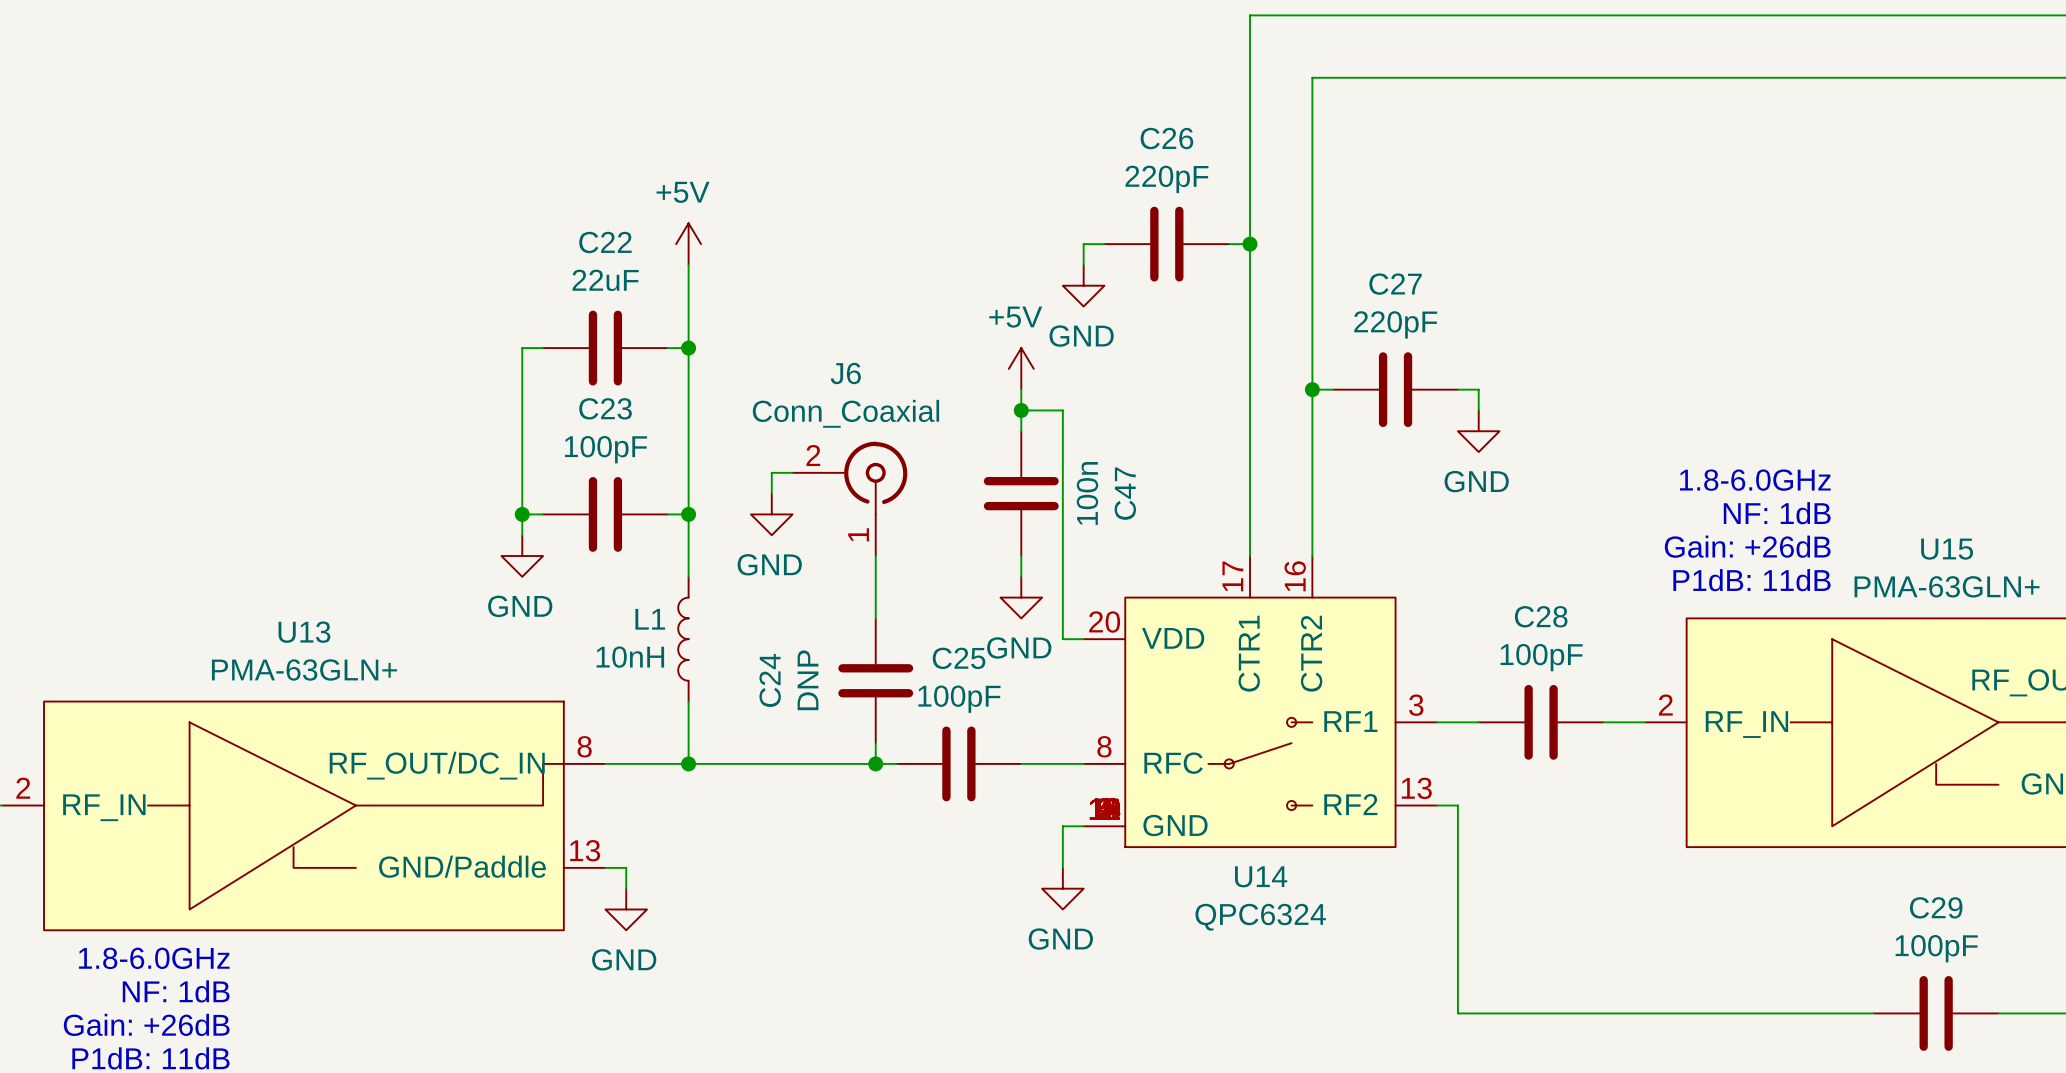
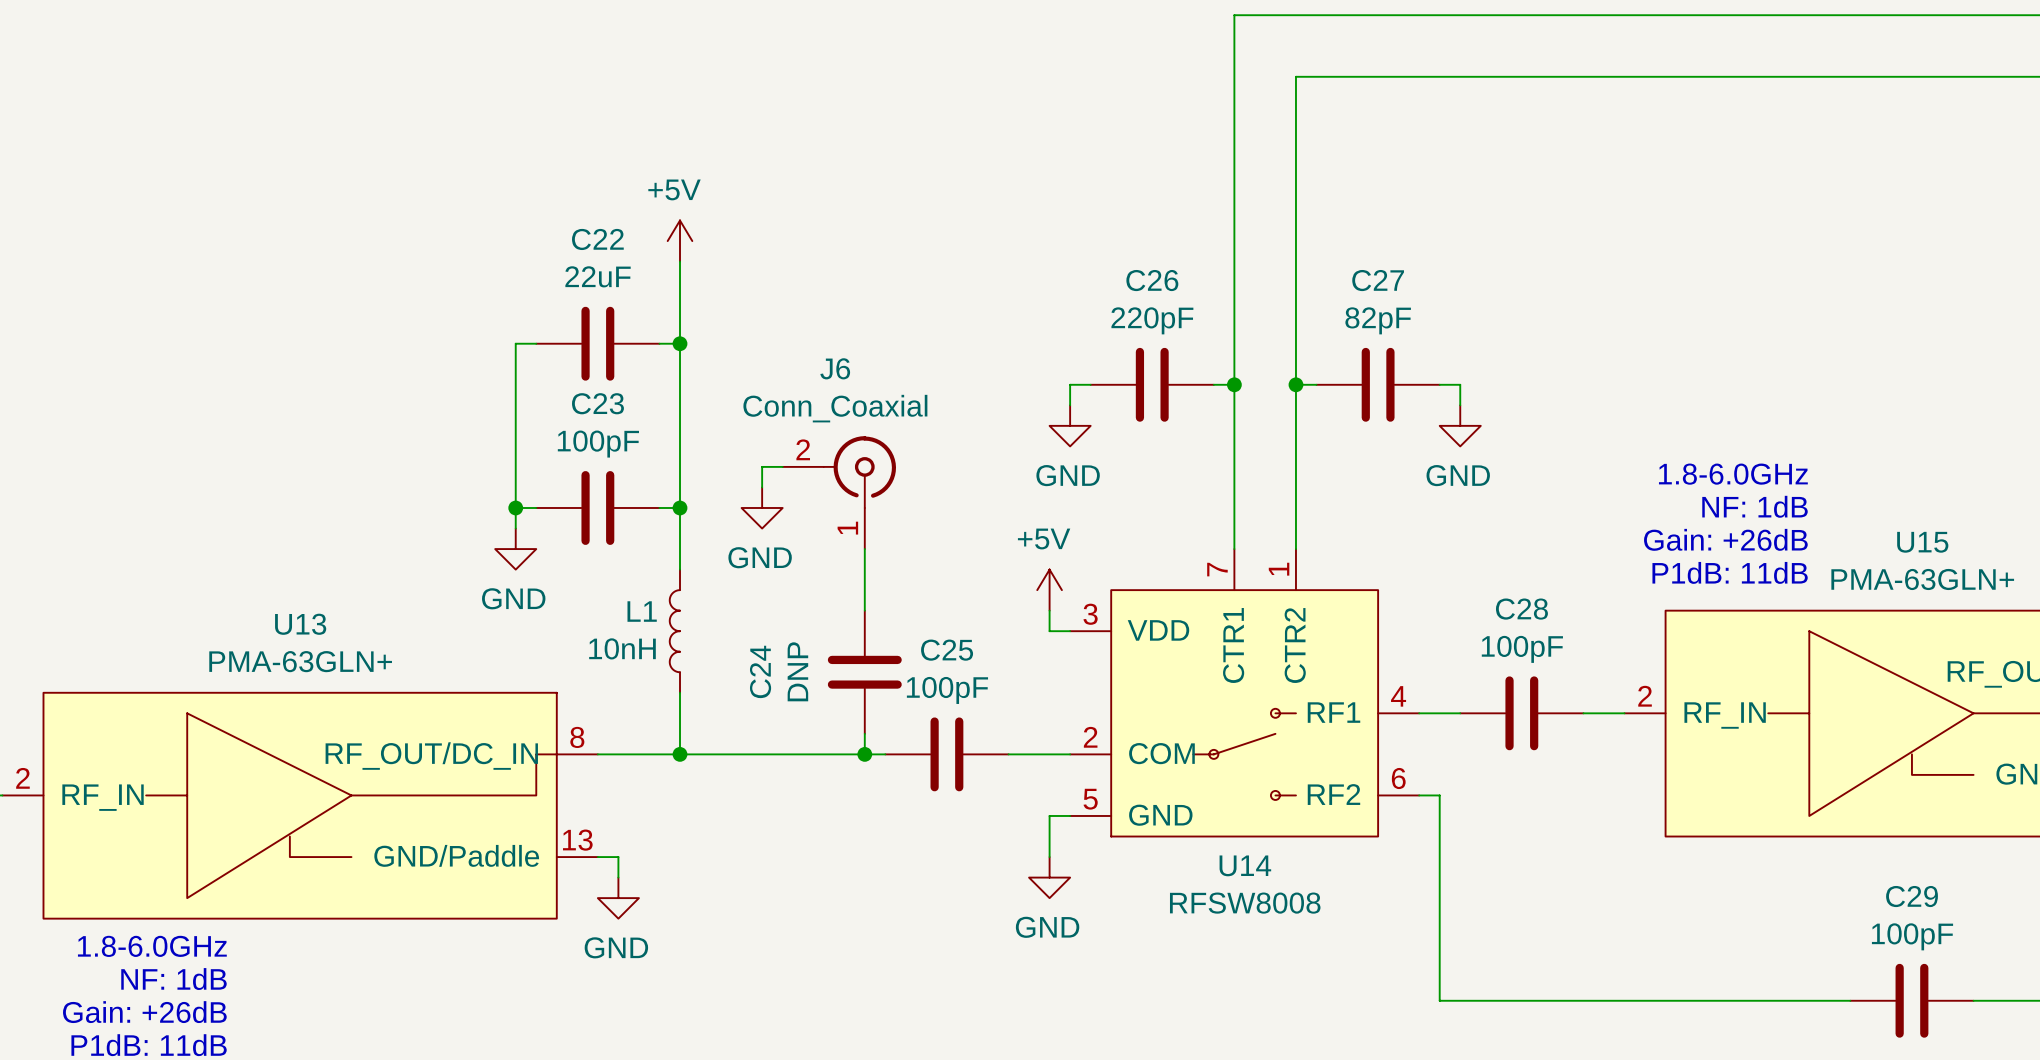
wire: (1104, 244) (1083, 244) (1083, 264) -> (1090, 384) (1070, 384) (1070, 405)
C26 position: (1166, 244) -> (1152, 384)
wire: (1229, 244) (1250, 244) -> (1213, 384) (1234, 384)
junction: (1250, 244) -> none
power symbol: GND (1083, 285) -> none
C27 value: 220pF (1395, 324) -> 82pF (1378, 320)
power symbol position: +5V (1021, 368) -> +5V (1049, 590)
wire: (1021, 389) (1021, 431) -> none
junction: none -> (1234, 384)
wire: (1021, 410) (1062, 410) (1062, 618) -> none
junction: (1021, 410) -> none
power symbol: none -> GND (1070, 425)
C47: 100n (1021, 493) -> none
wire: (1021, 556) (1021, 576) -> none
U14 symbol: [1083, 556, 1438, 848] -> [1070, 549, 1420, 837]
power symbol: GND (1021, 597) -> none
U14 value: QPC6324 (1260, 917) -> RFSW8008 (1245, 903)

